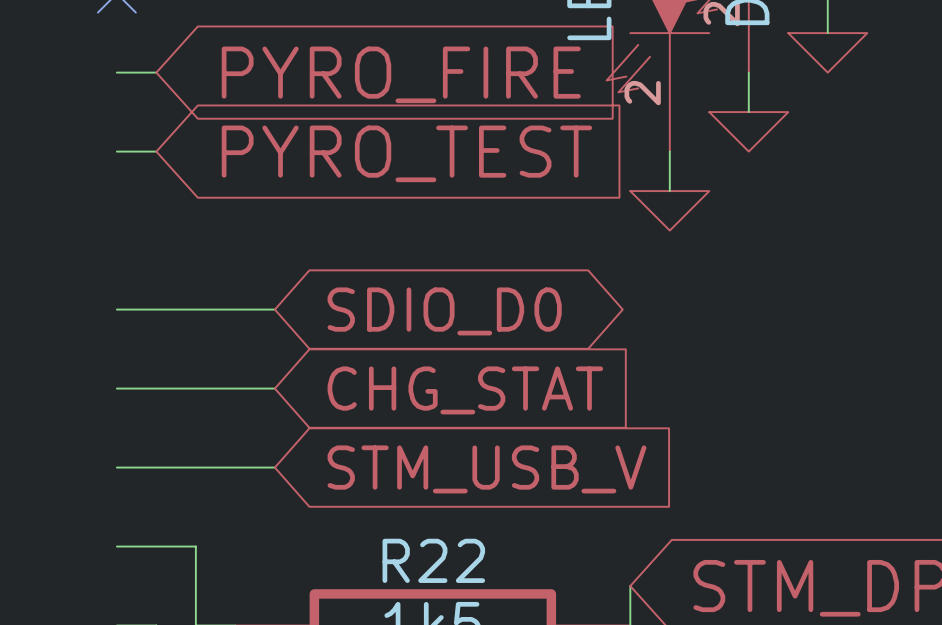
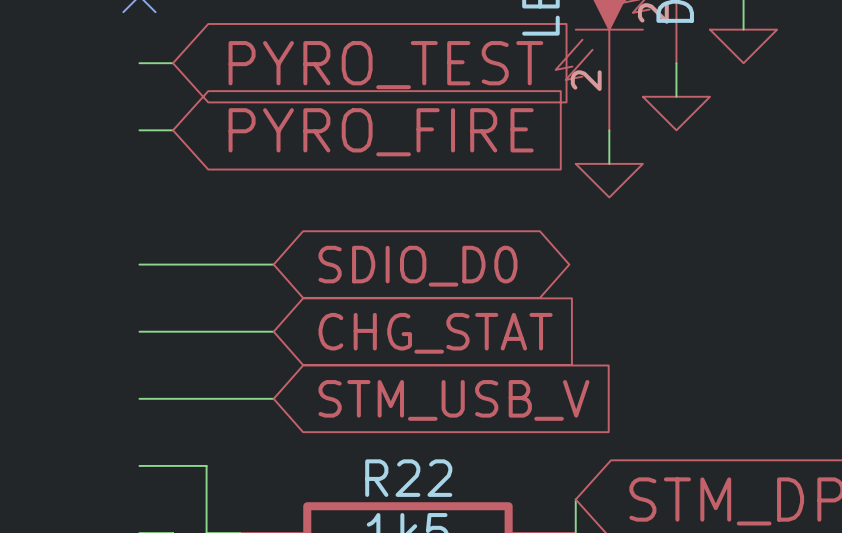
global label: PYRO_FIRE (401, 74) -> PYRO_TEST (385, 65)
global label: PYRO_TEST (406, 153) -> PYRO_FIRE (381, 132)

